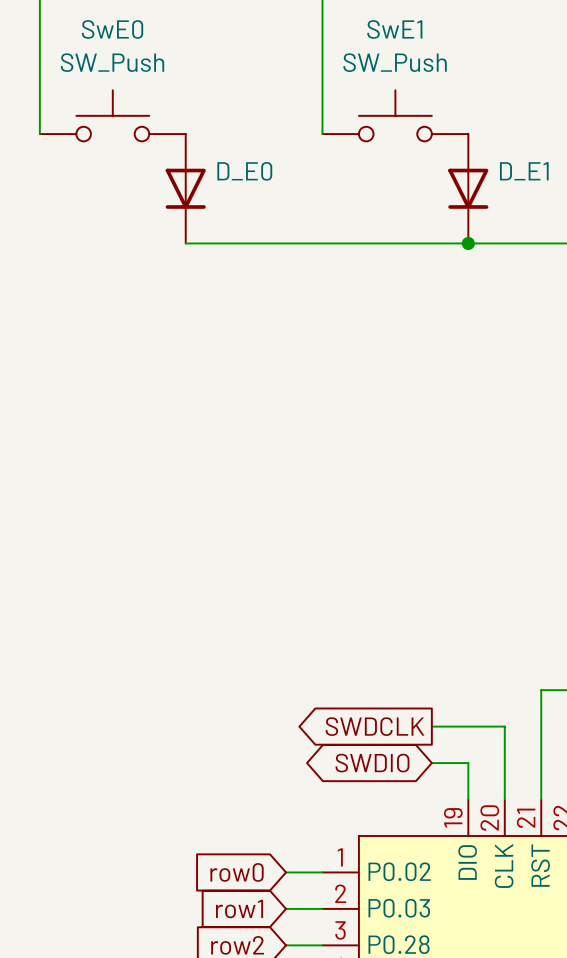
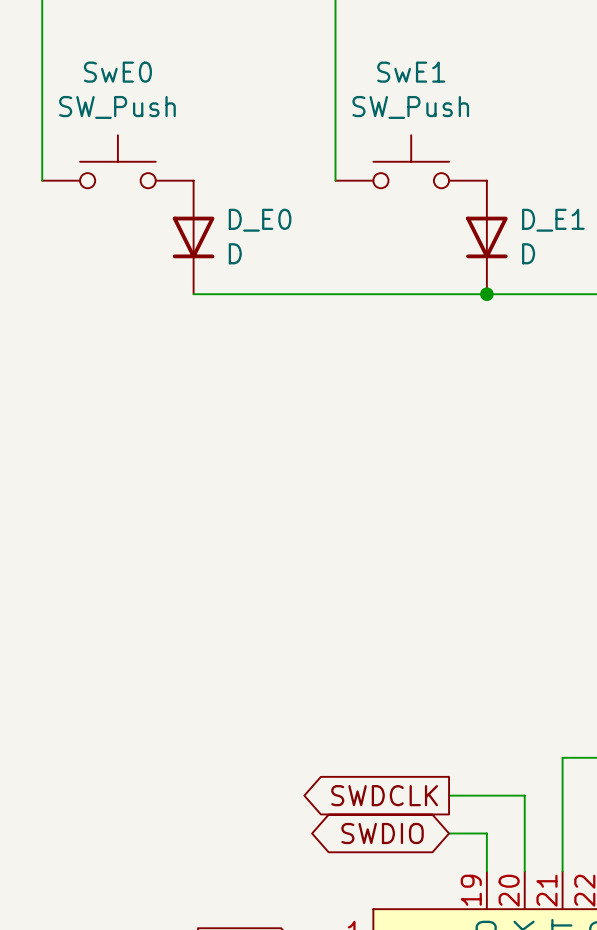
D_E0 value: none -> D (235, 253)
D_E1 value: none -> D (528, 253)

